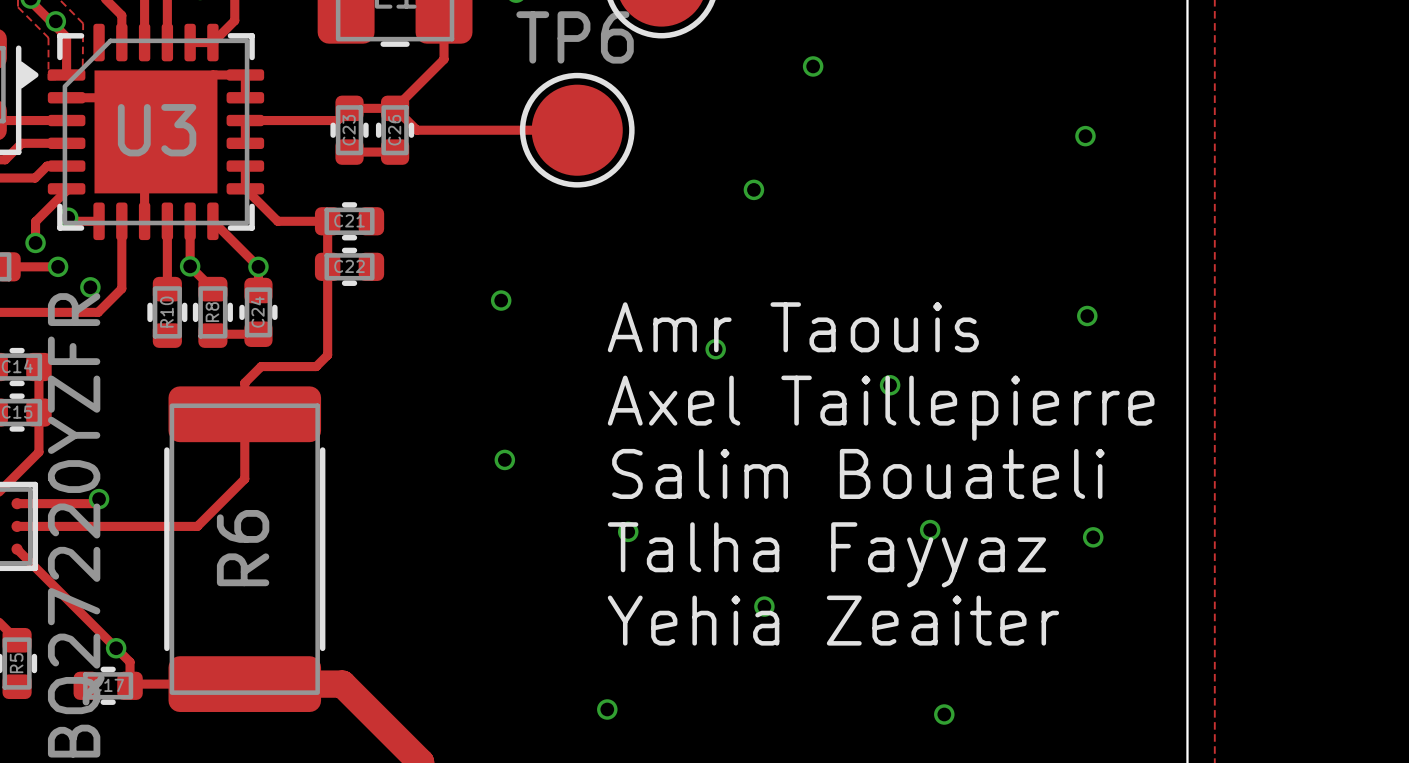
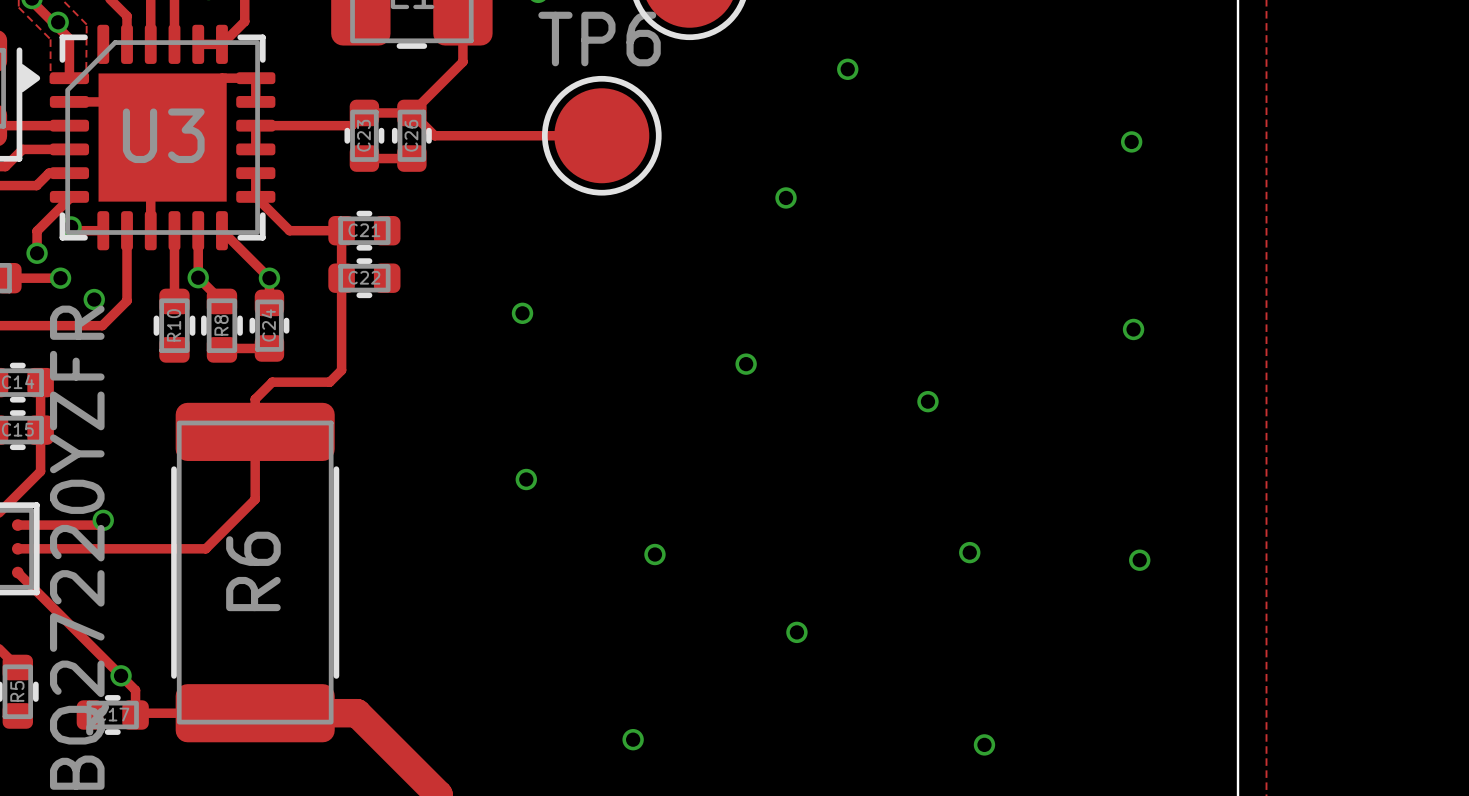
text: Amr Taouis (793, 327) -> none
text: Axel Taillepierre (881, 408) -> none
text: Salim Bouateli (858, 473) -> none
text: Talha Fayyaz (826, 554) -> none
text: Yehia Zeaiter (833, 620) -> none

